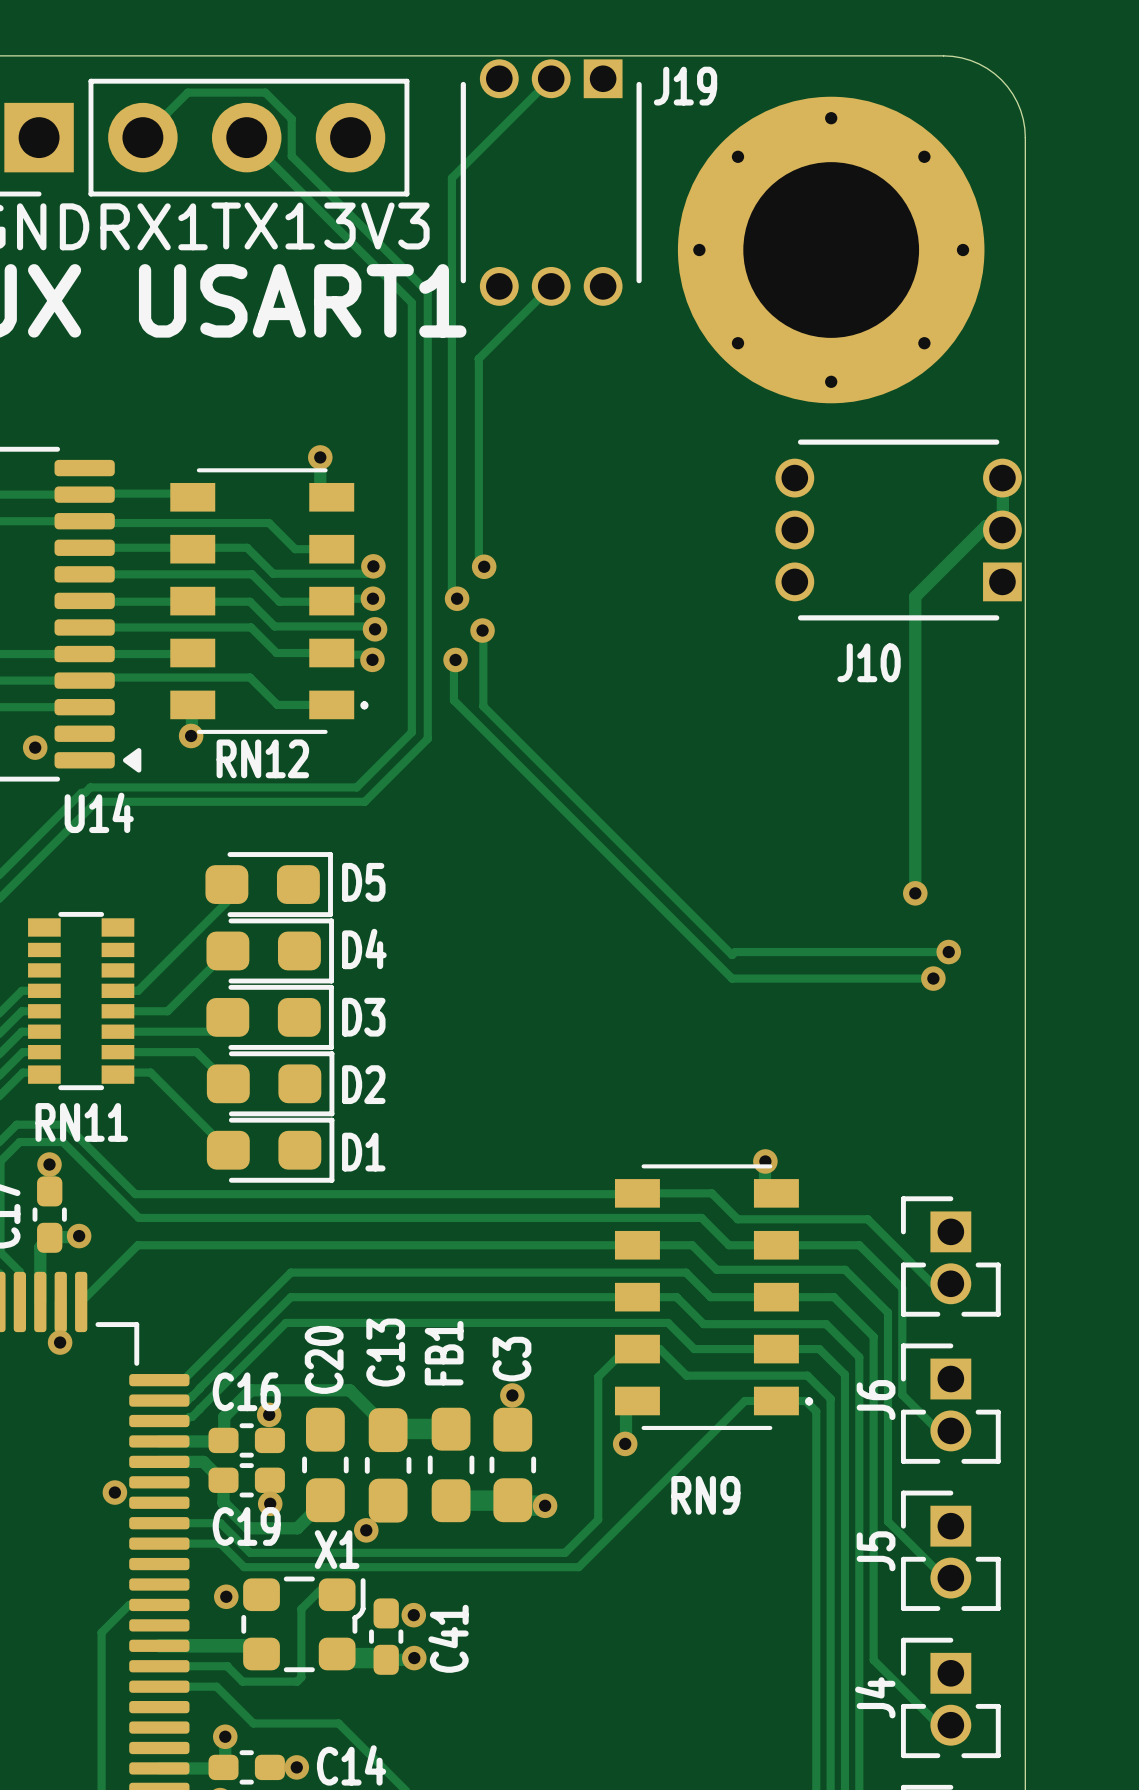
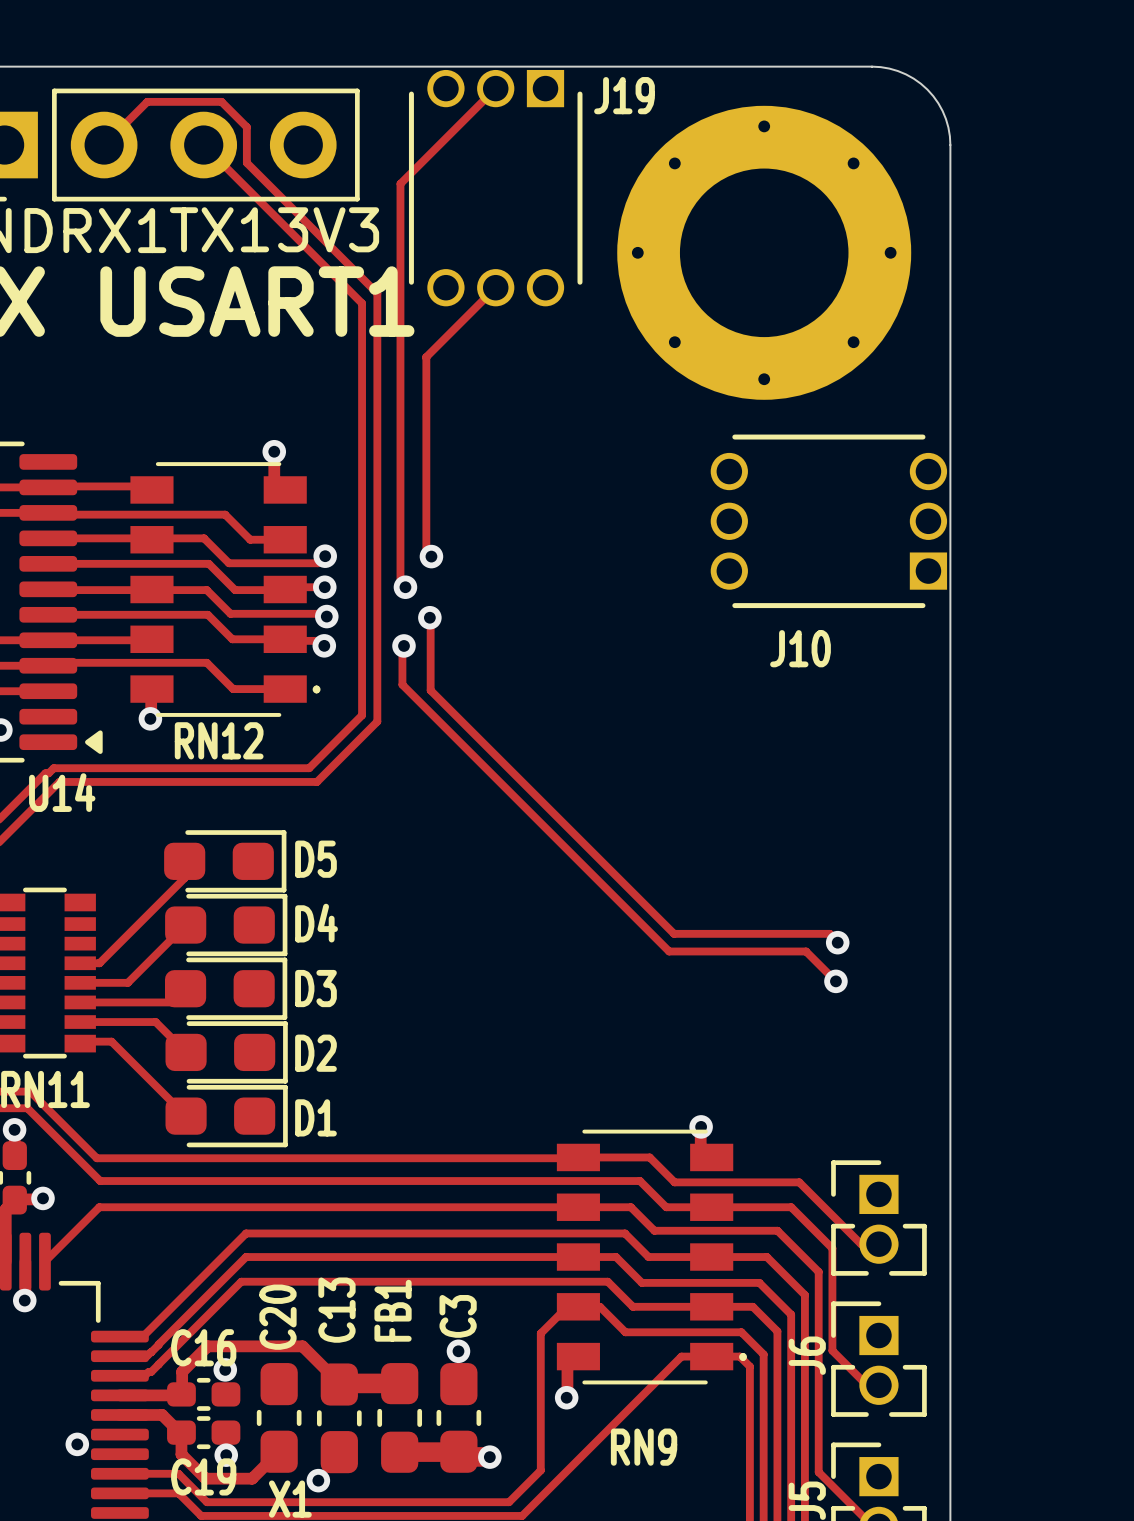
track: (1002, 473) (1002, 525) (986, 525) (915, 596) (915, 893) -> none
via: (915, 893) -> none
track: (948, 952) (735, 952) (732, 955) -> (837, 942) (829, 933) (674, 933) (669, 928)
via: (948, 952) -> none
via: none -> (837, 942)
track: (874, 978) (933, 978) -> (806, 951) (835, 981)
via: (933, 978) -> none
via: none -> (835, 981)

